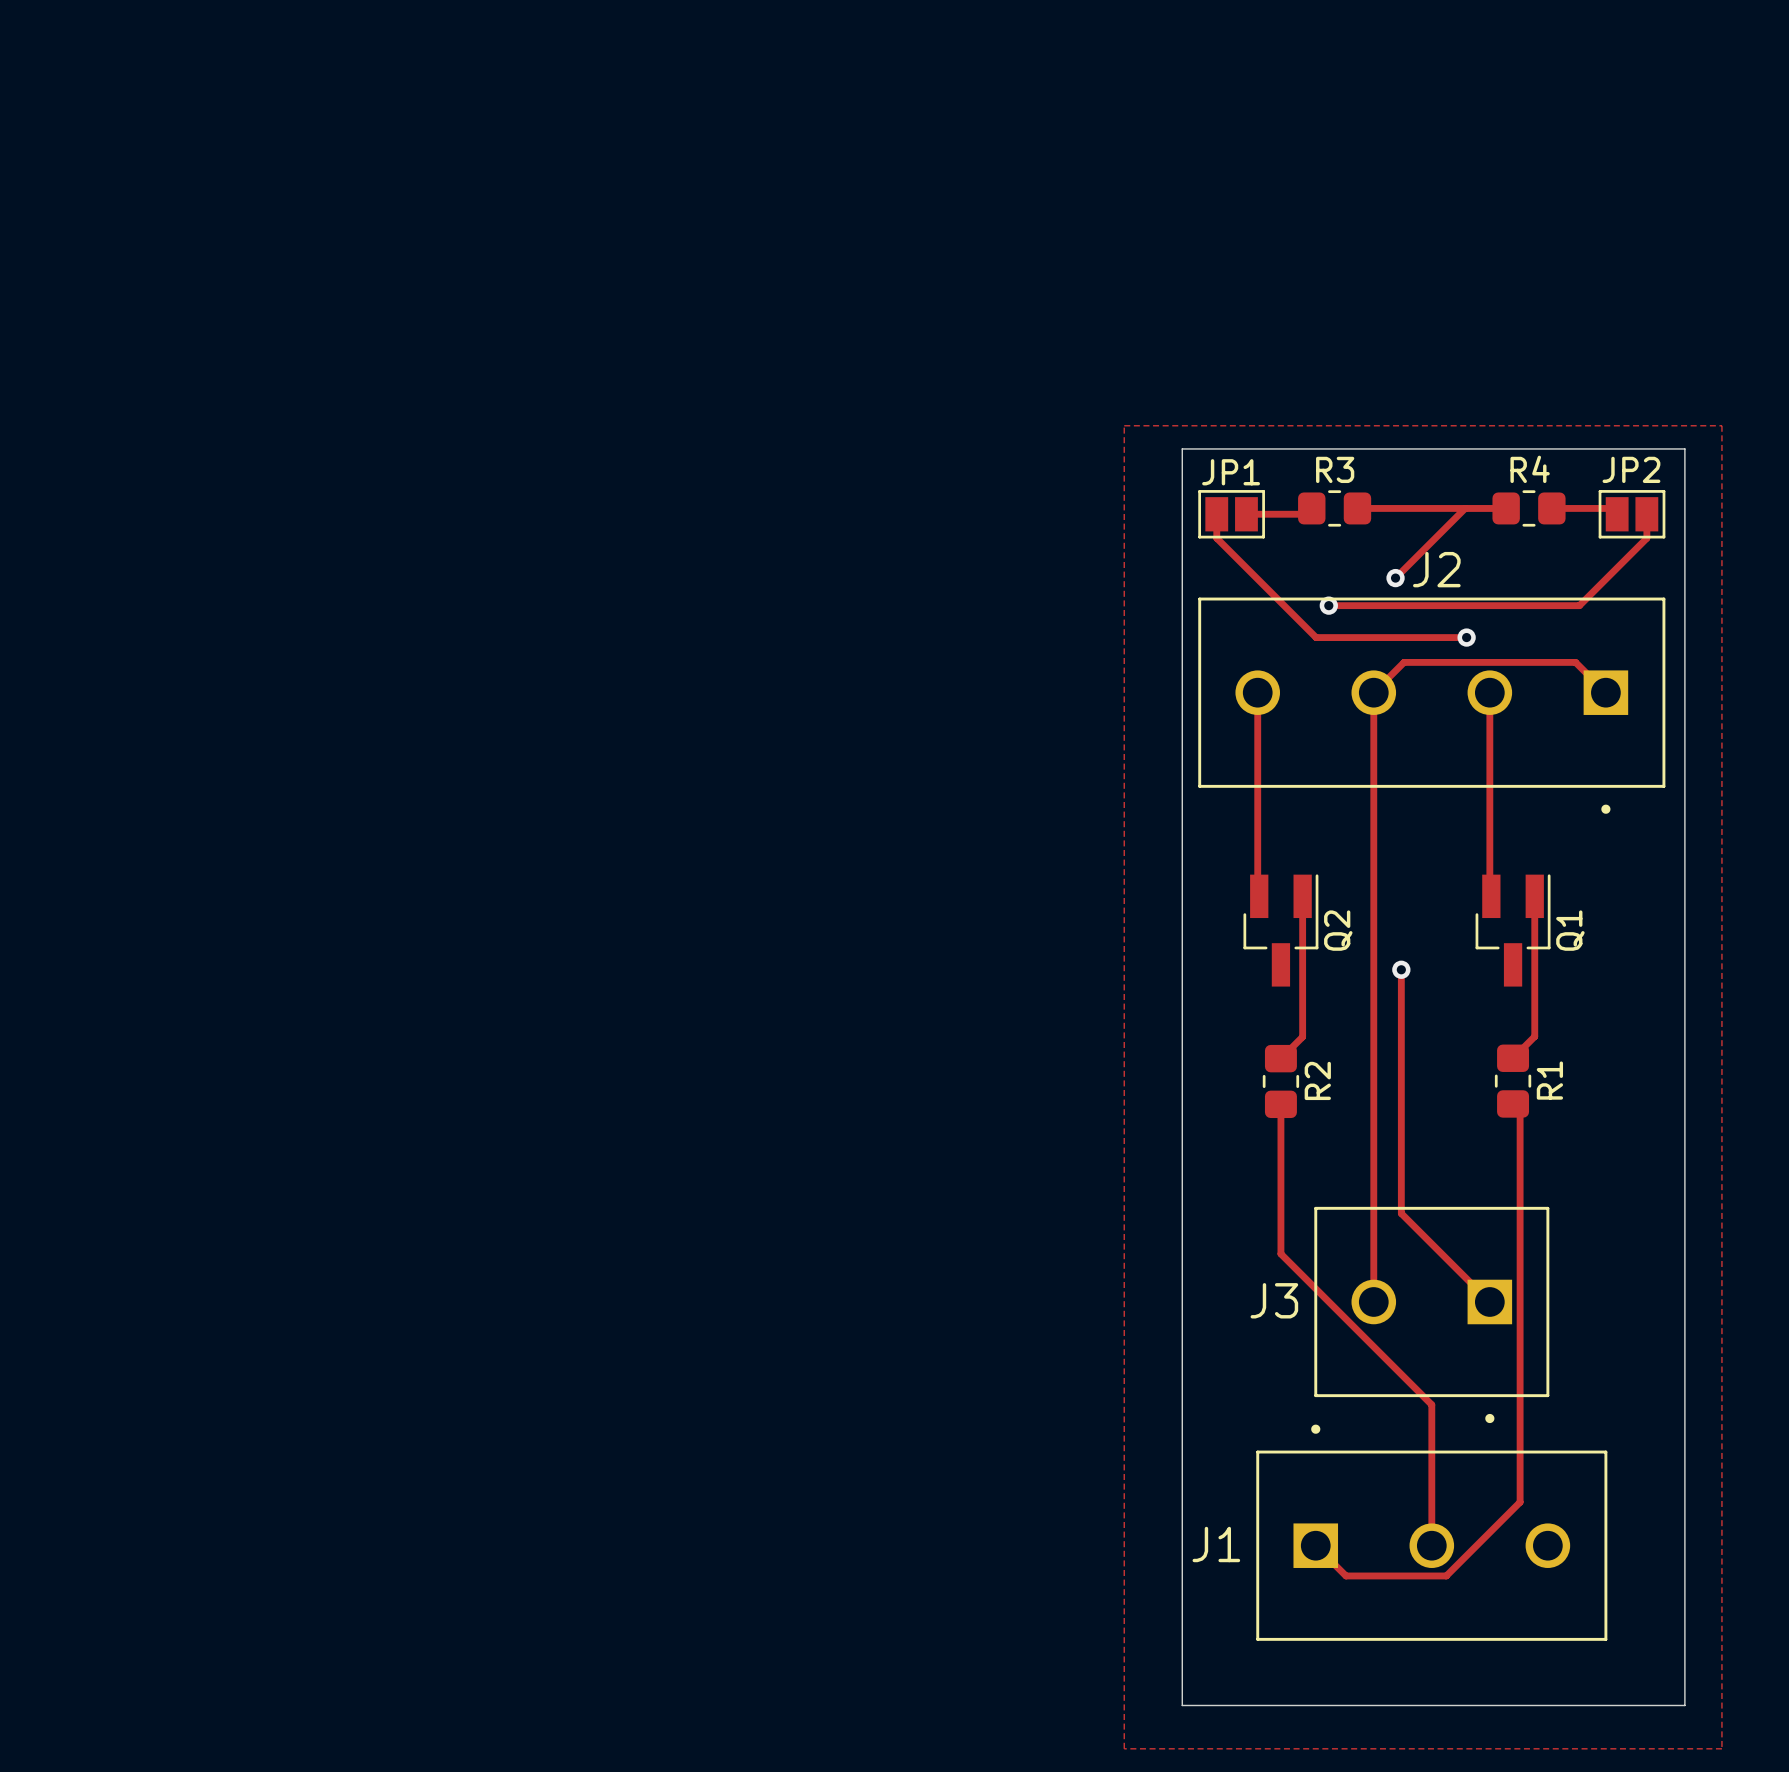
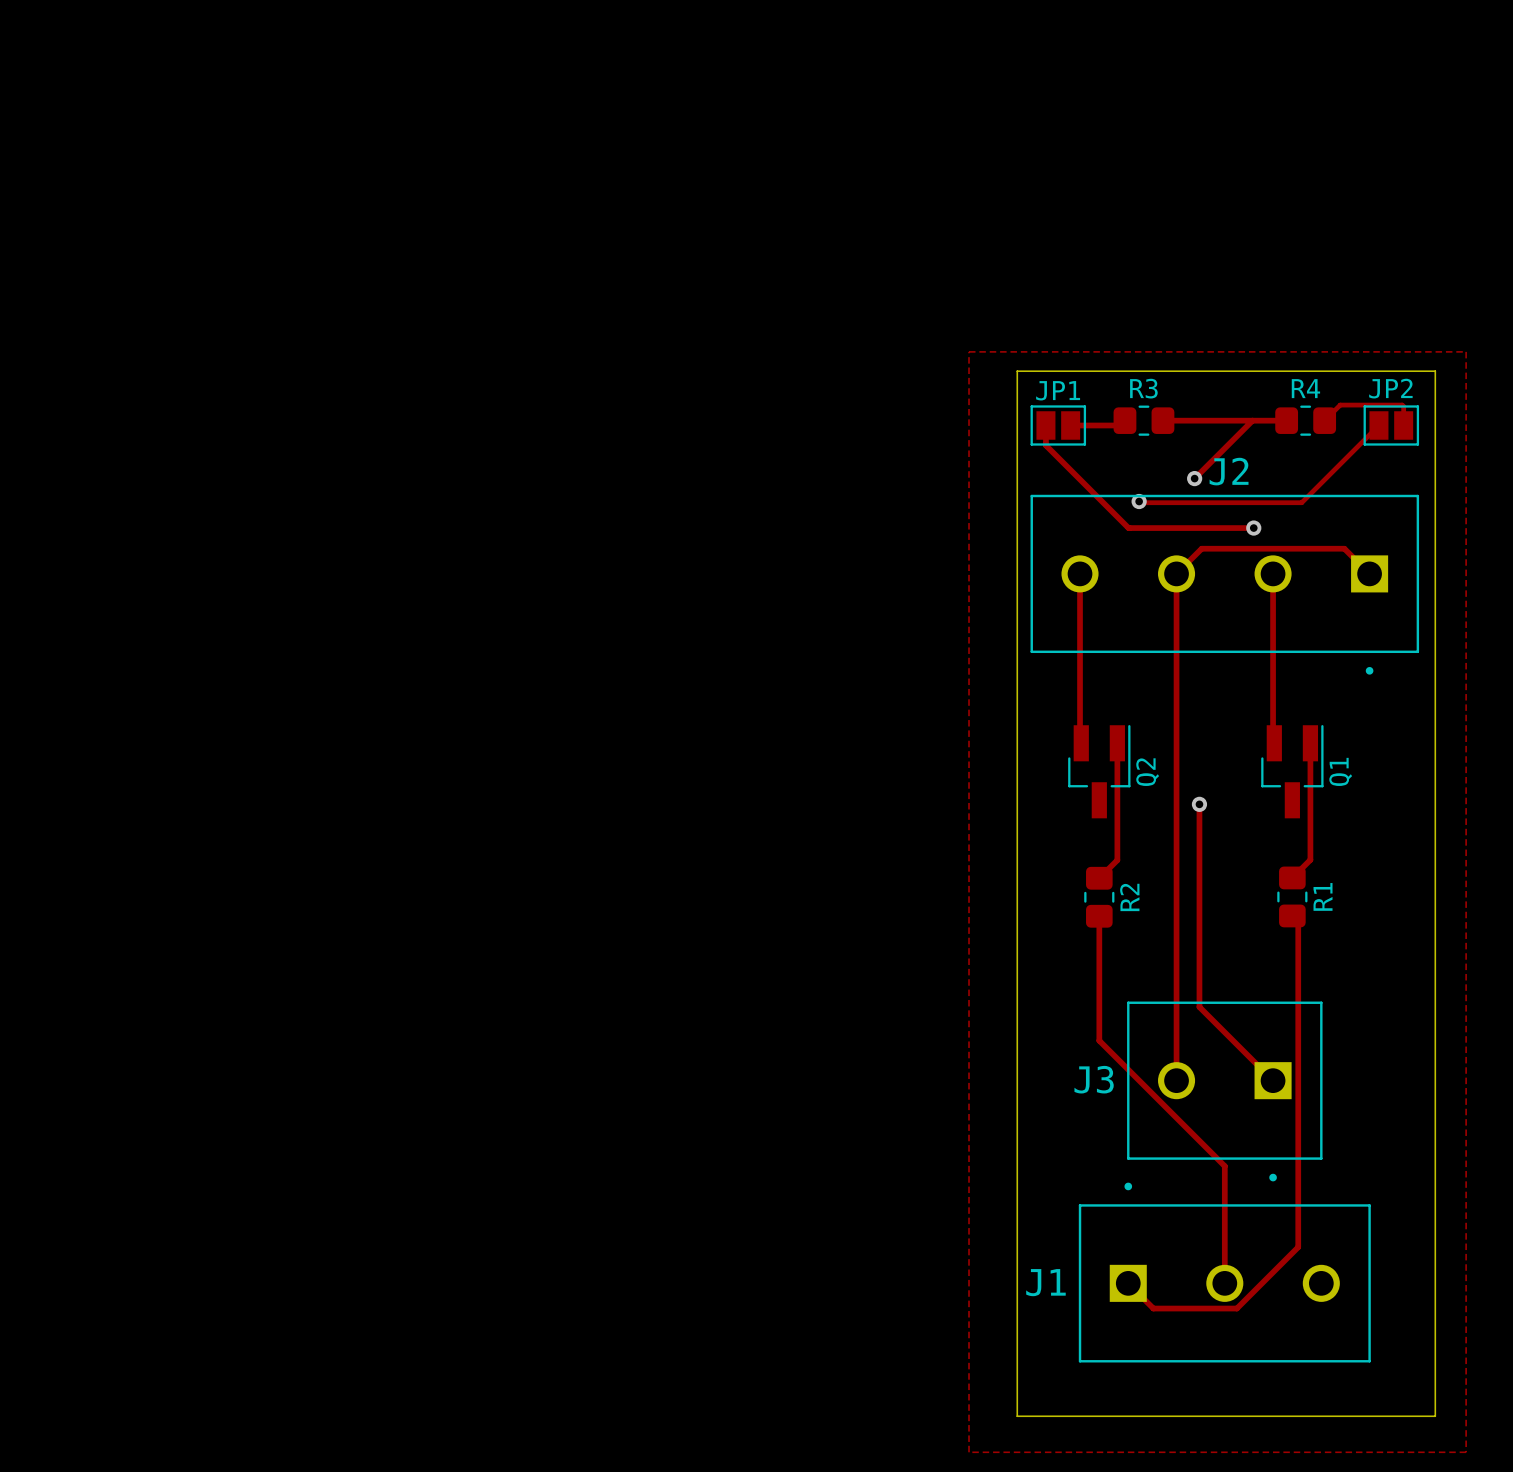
track: (1557, 514) (1551, 508) (1611, 508) (1617, 514) -> (1140, 502) (1301, 502) (1378, 425)
track: (1646, 514) (1646, 538) (1579, 605) (1328, 605) -> (1403, 425) (1402, 405) (1340, 405) (1324, 420)

